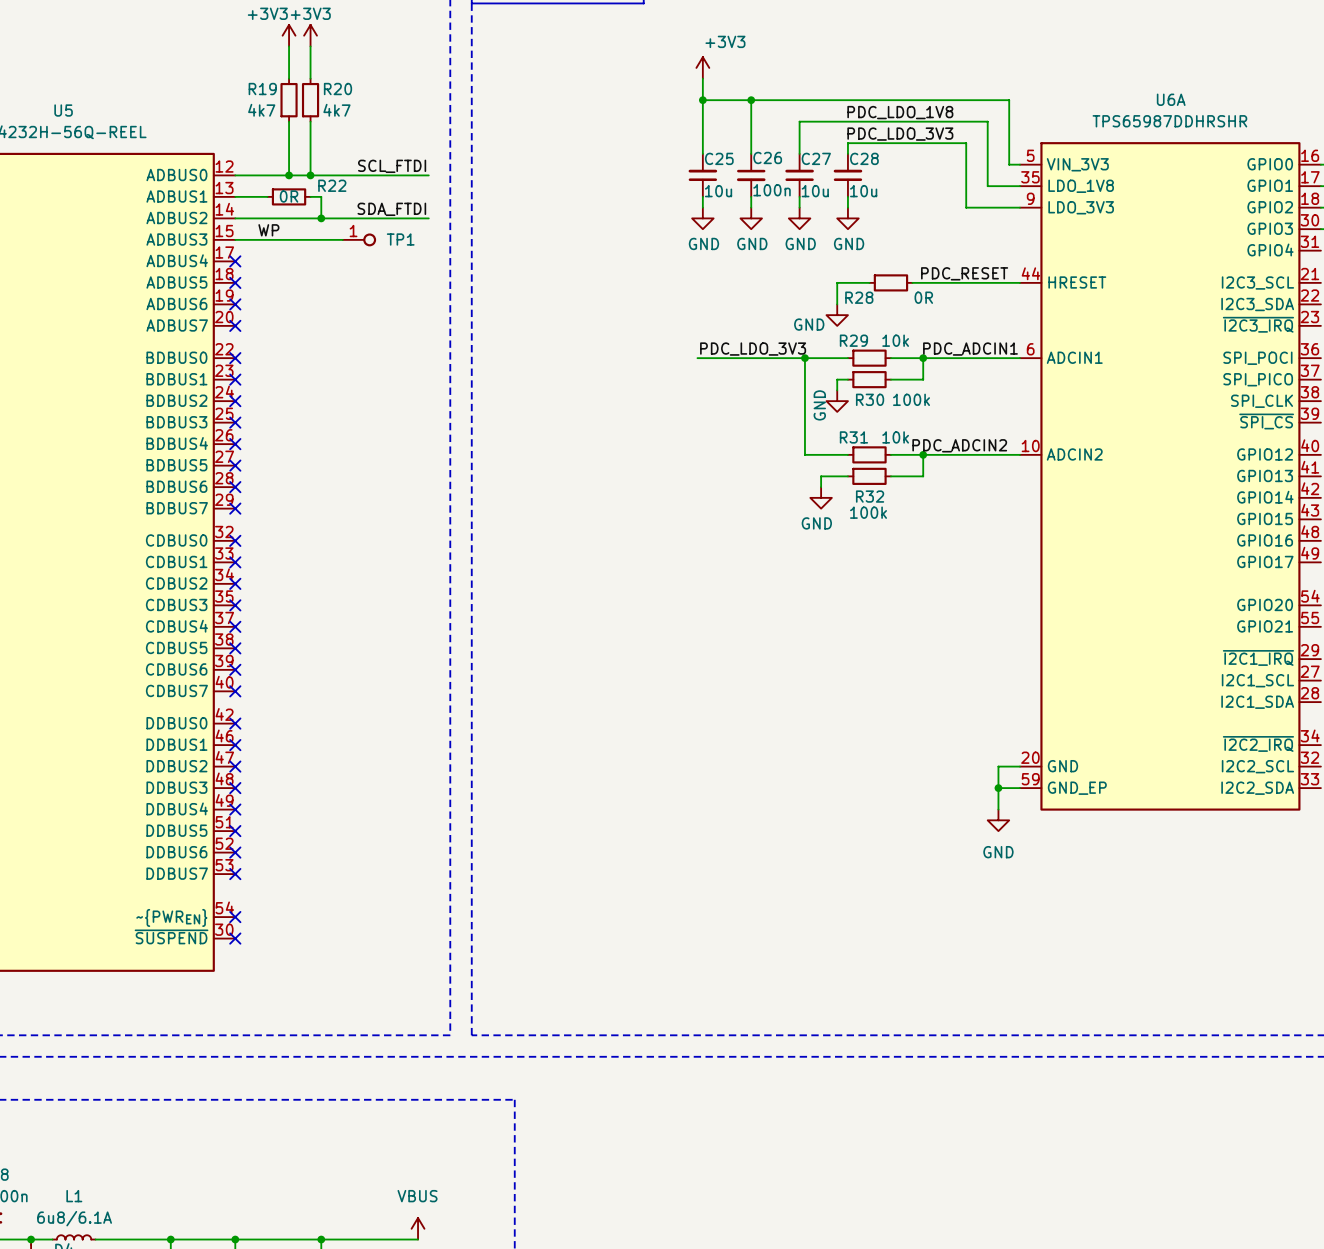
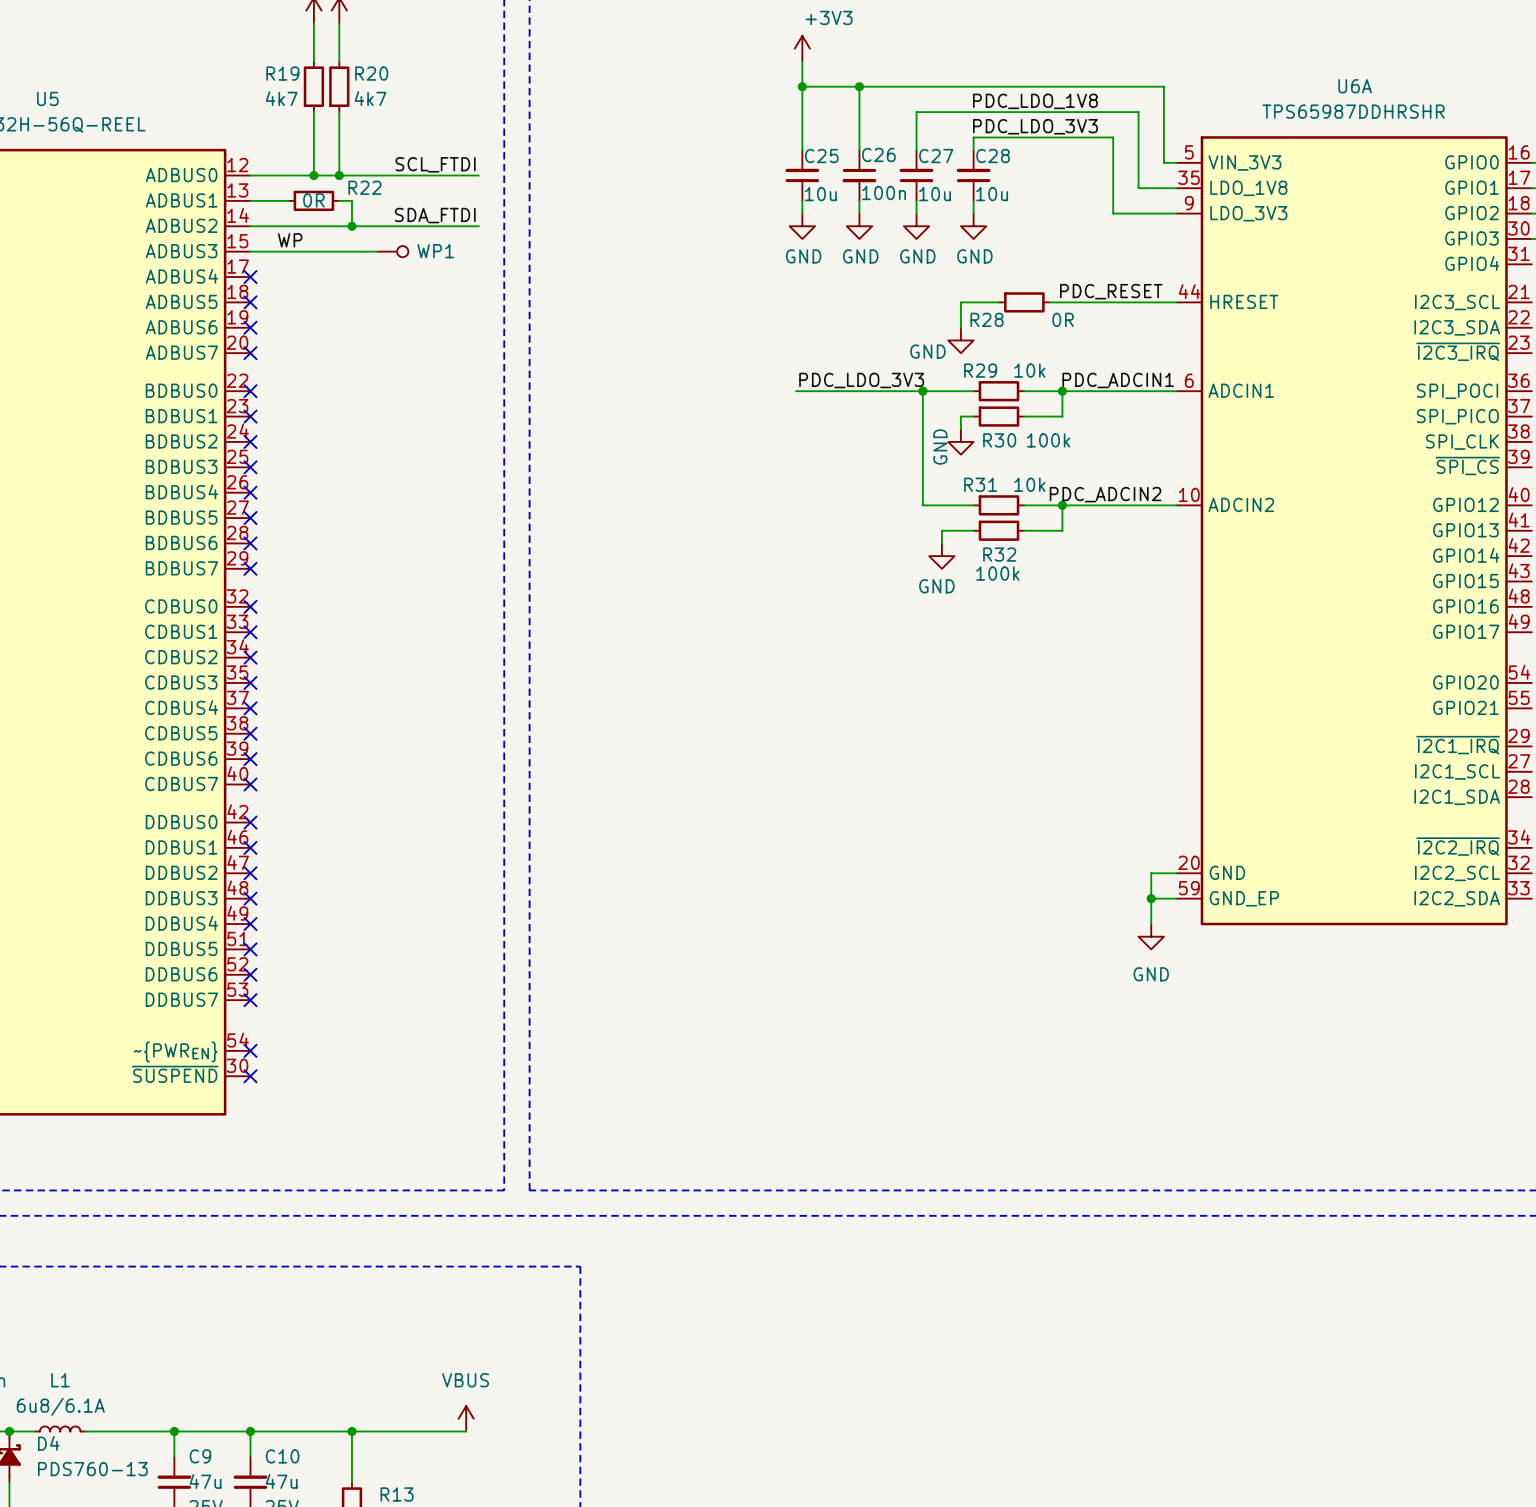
WP1: none -> (392, 251)
TP1: (359, 239) -> none

